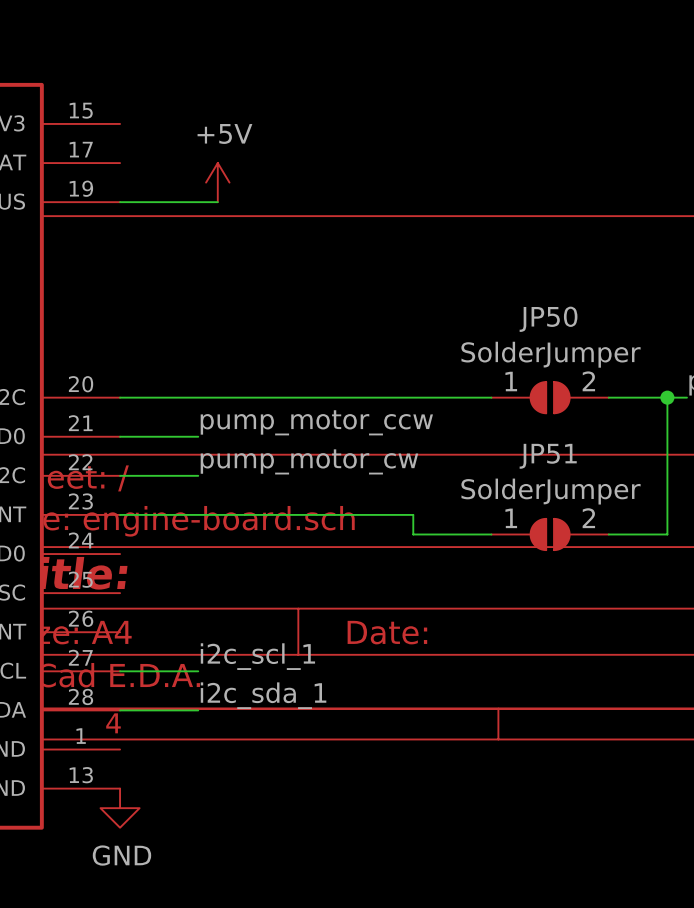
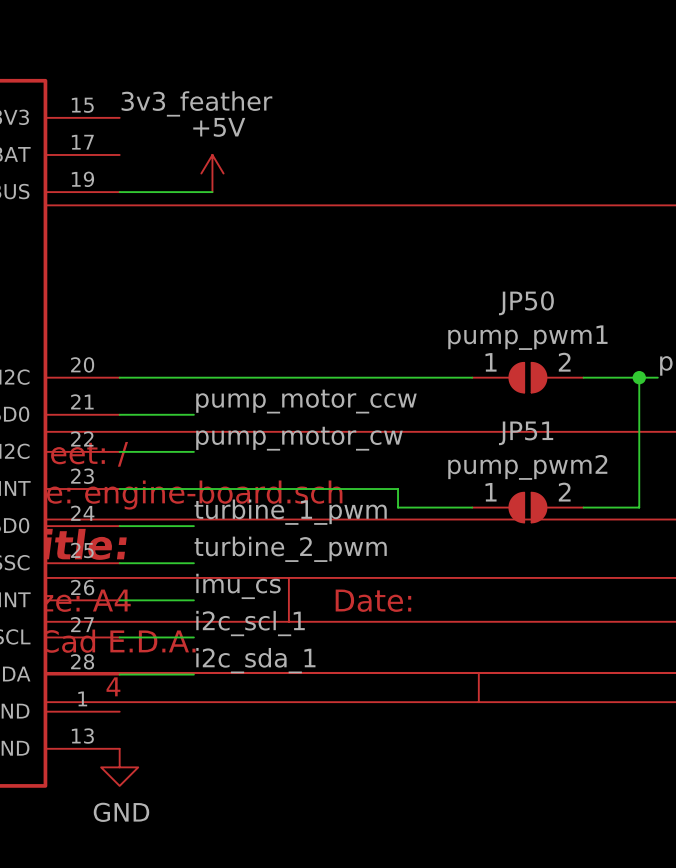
label: none -> 3v3_feather (196, 103)
JP50 value: SolderJumper (551, 354) -> pump_pwm1 (527, 337)
JP51 value: SolderJumper (551, 491) -> pump_pwm2 (527, 467)
label: none -> turbine_1_pwm (290, 512)
wire: none -> (119, 526) (193, 526)
label: none -> turbine_2_pwm (290, 549)
wire: none -> (119, 563) (193, 563)
label: none -> imu_cs (238, 586)
wire: none -> (119, 600) (193, 600)

